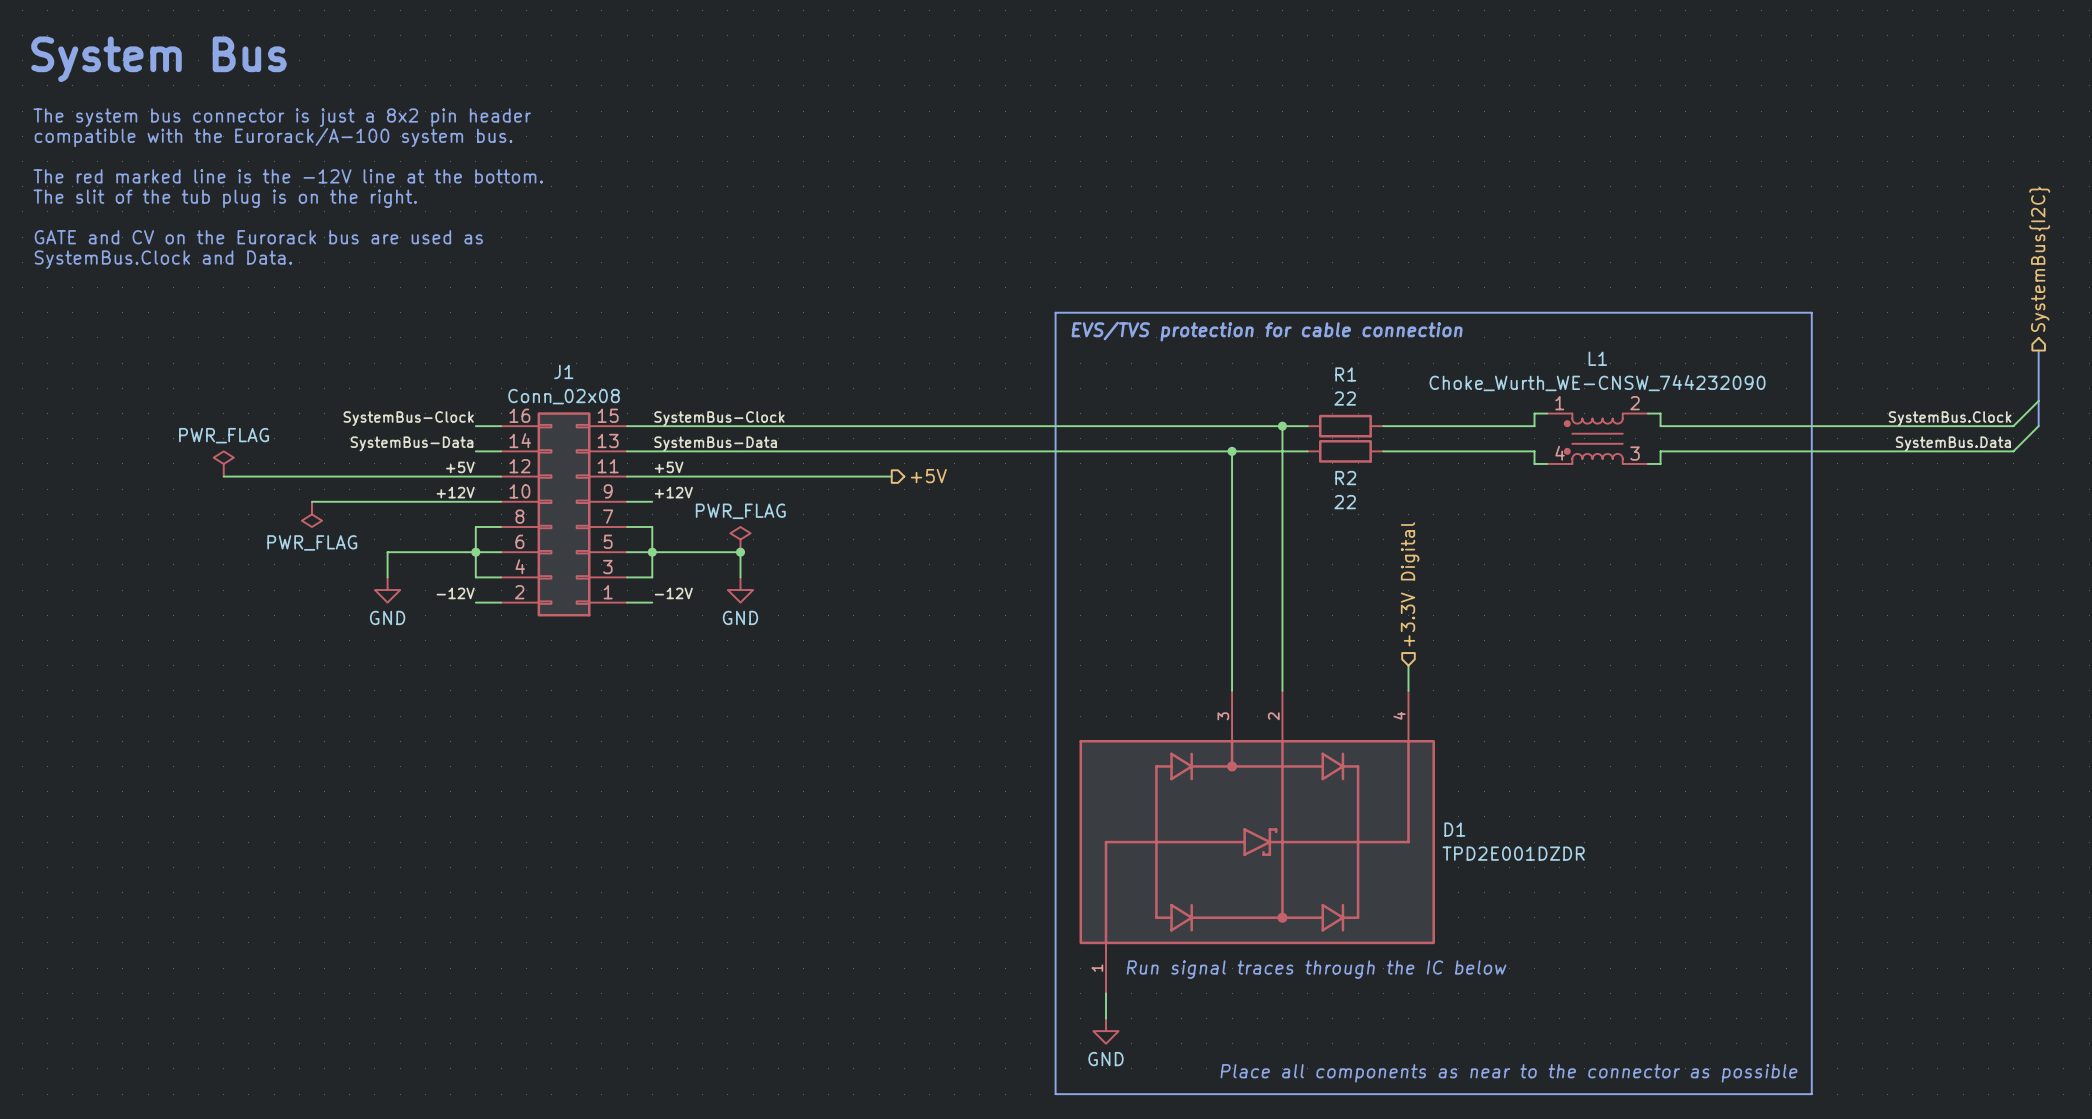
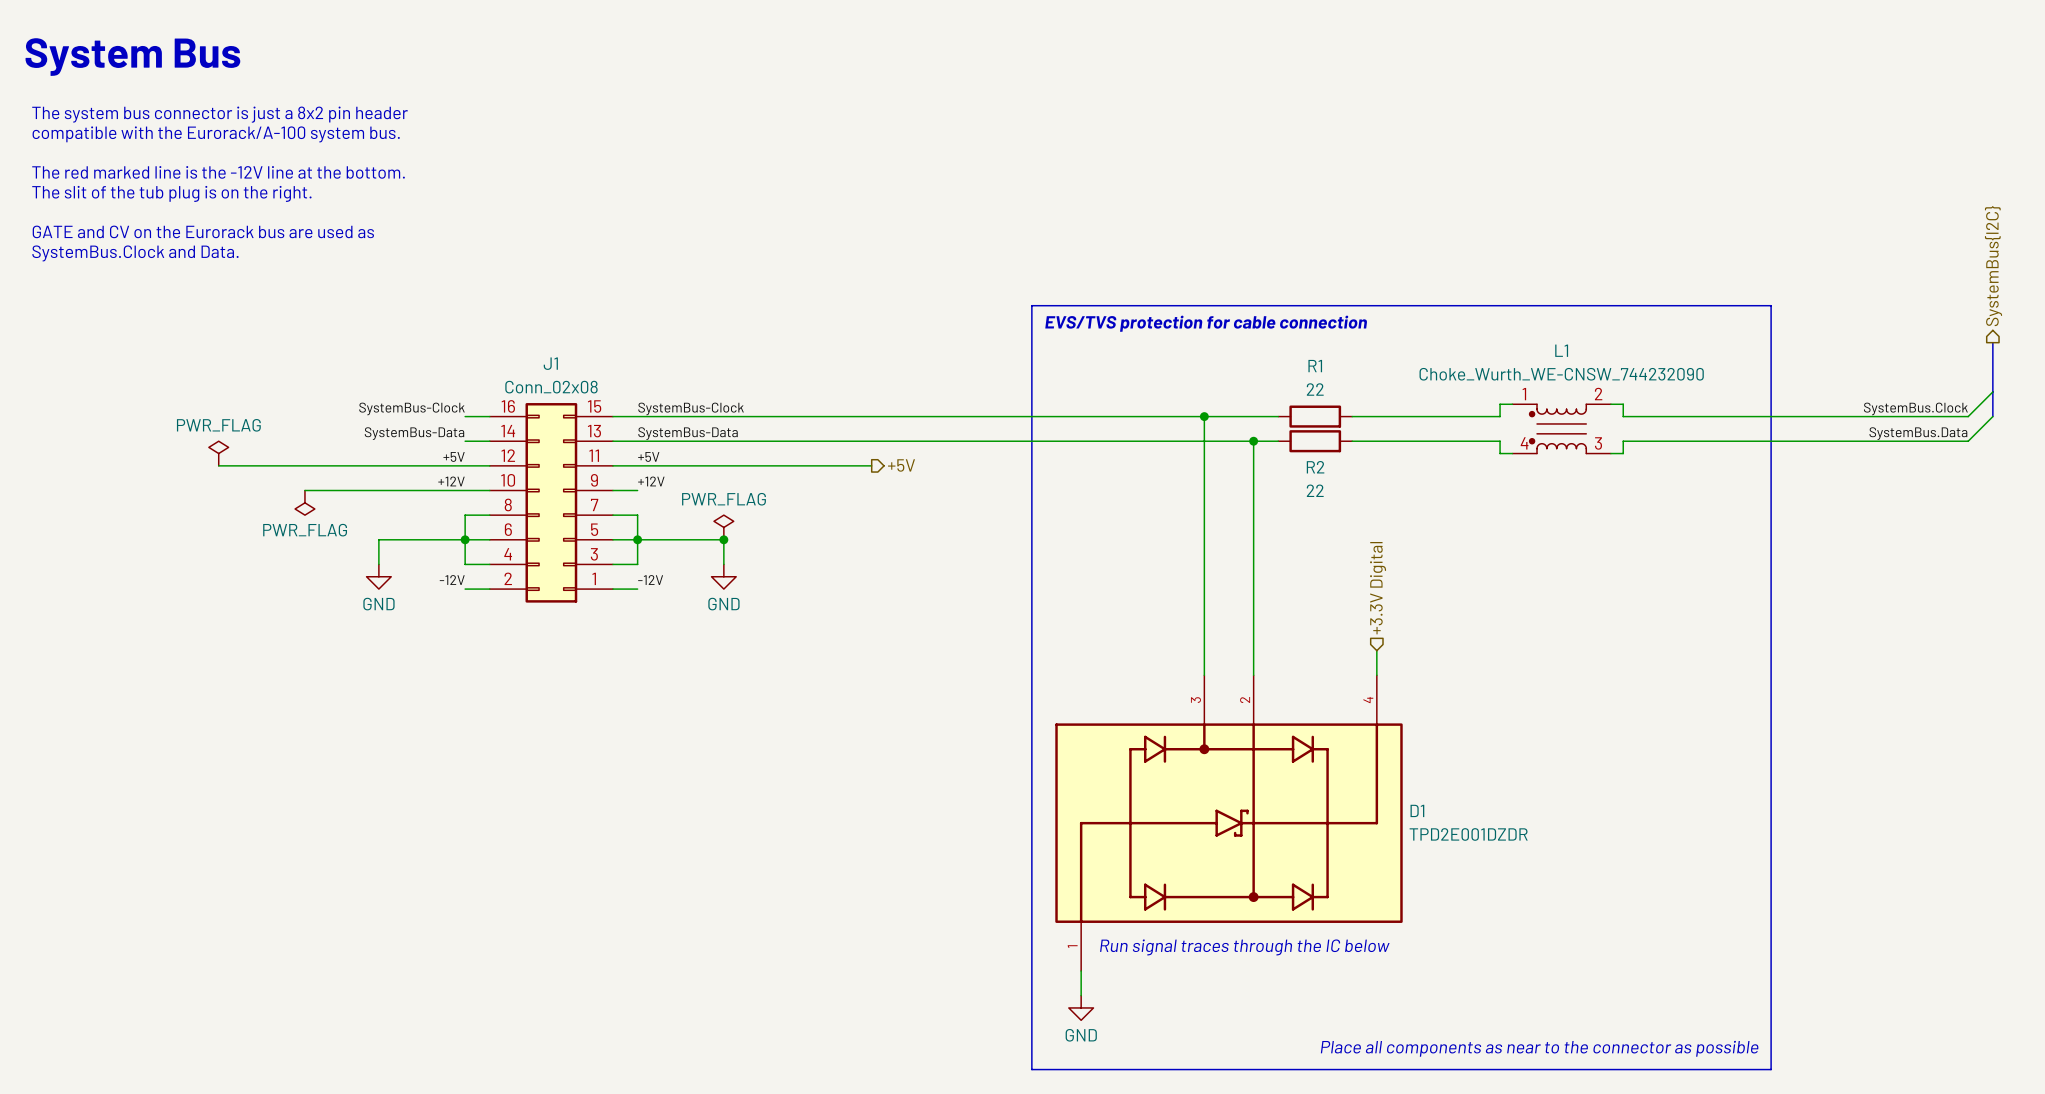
junction: none -> (1204, 416)
wire: (1282, 426) (1282, 451) -> (1204, 416) (1204, 441)
junction: (1282, 426) -> none
junction: (1232, 451) -> none
junction: none -> (1253, 441)

